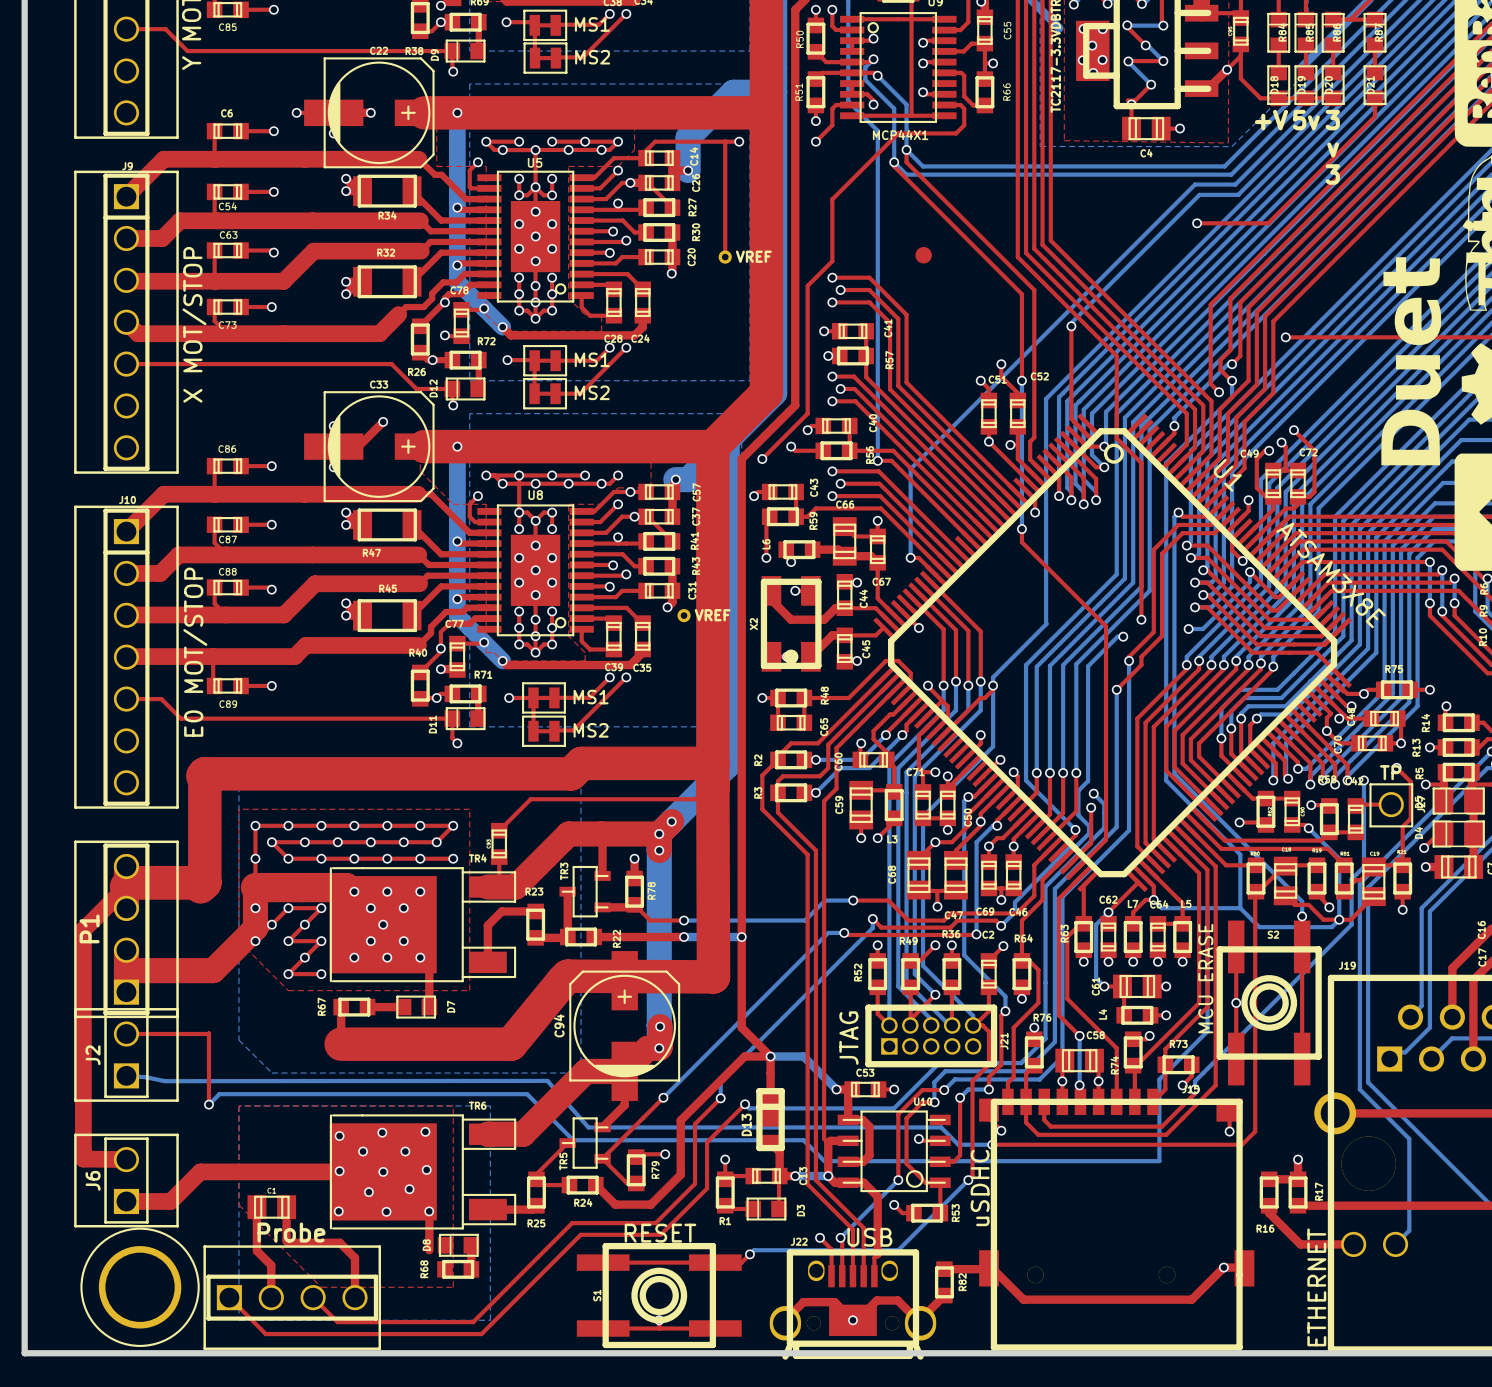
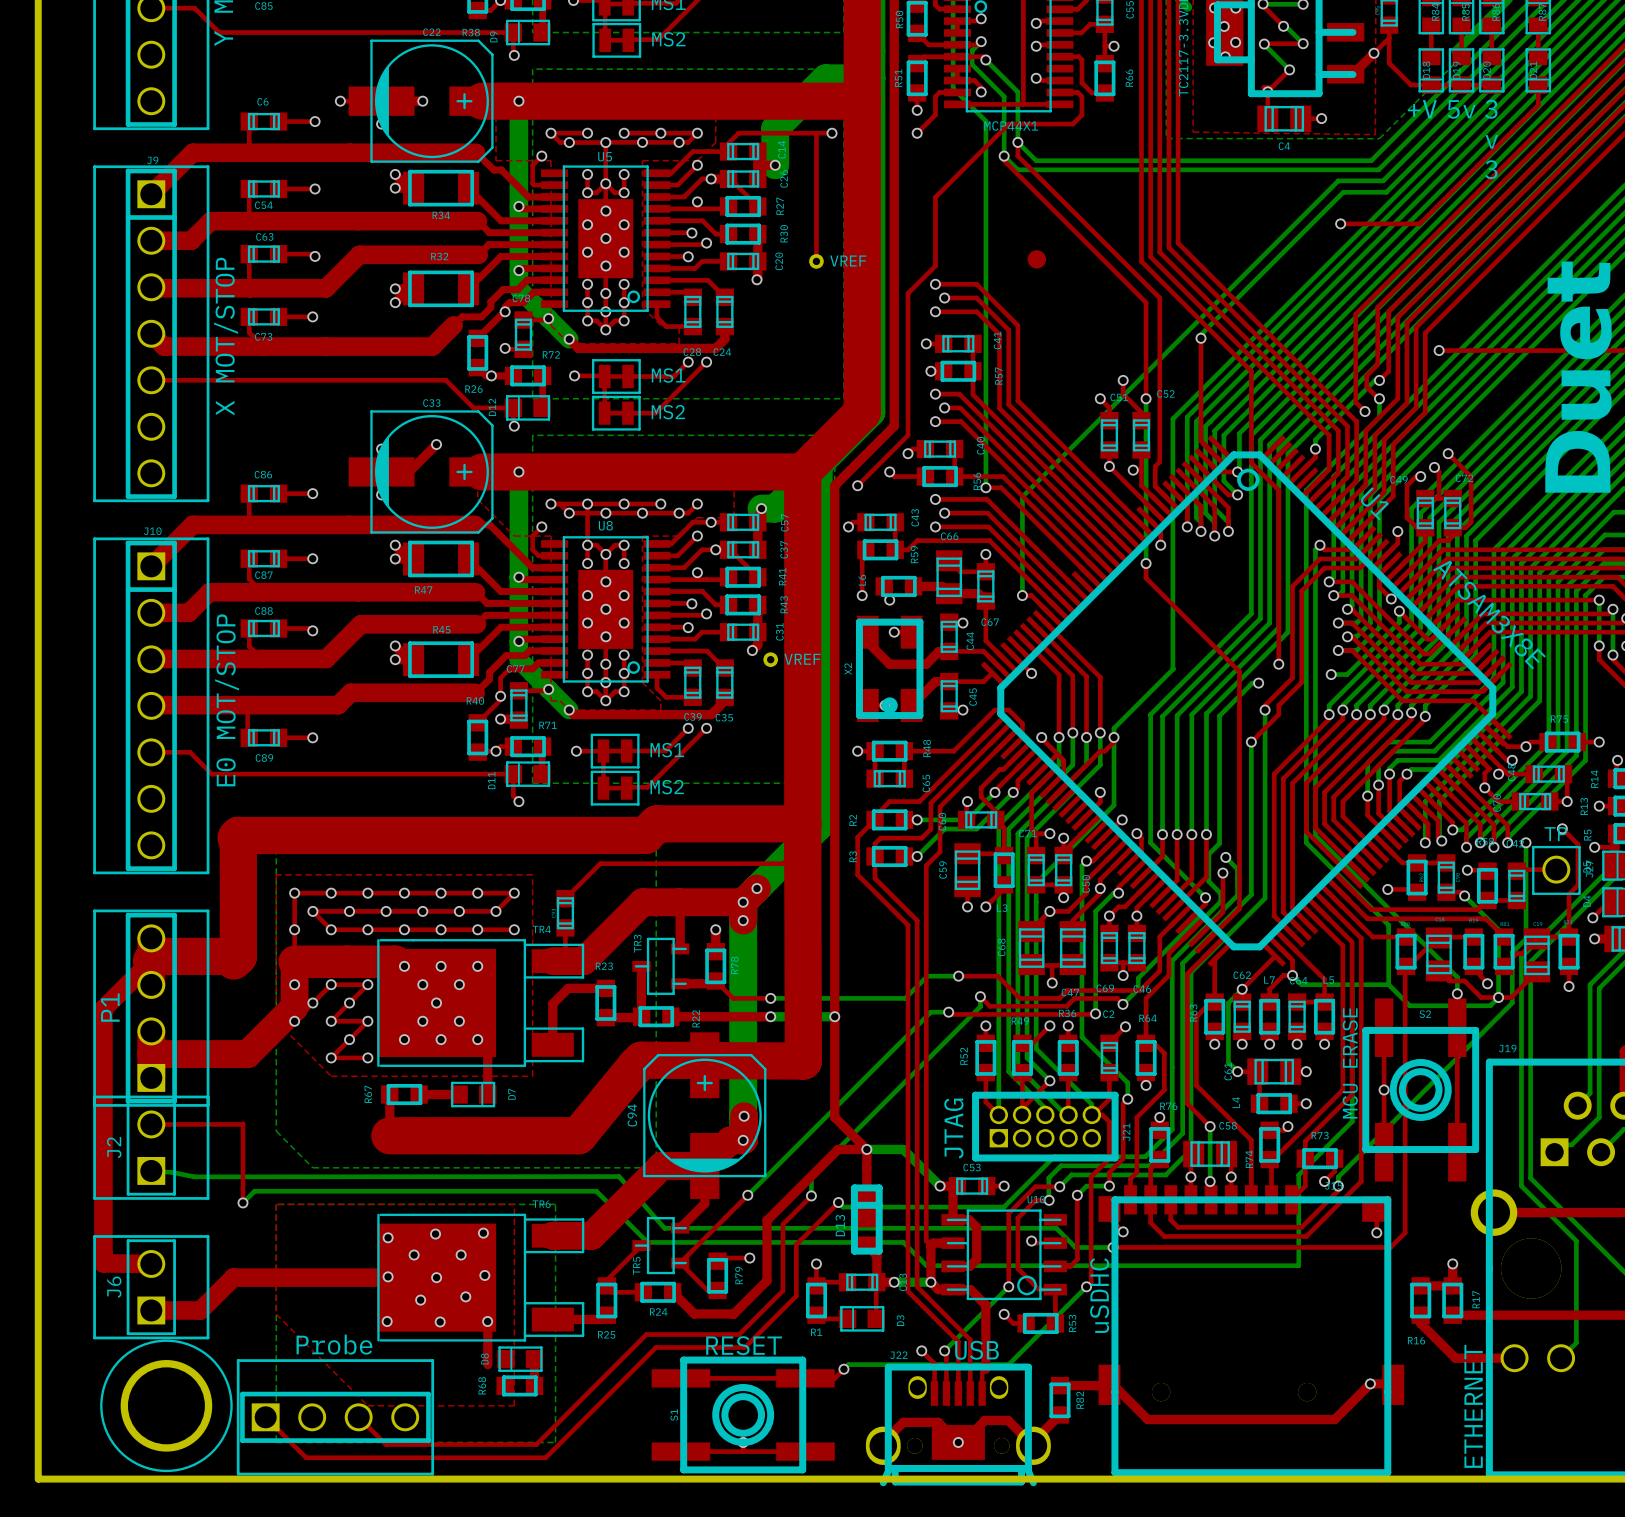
top track: (256, 1207) (256, 1251) (271, 1265) (271, 1297) -> none
part: (271, 1207) -> none
top track: (286, 1207) (286, 1240) (288, 1242) (339, 1242) (355, 1257) (355, 1297) -> none

